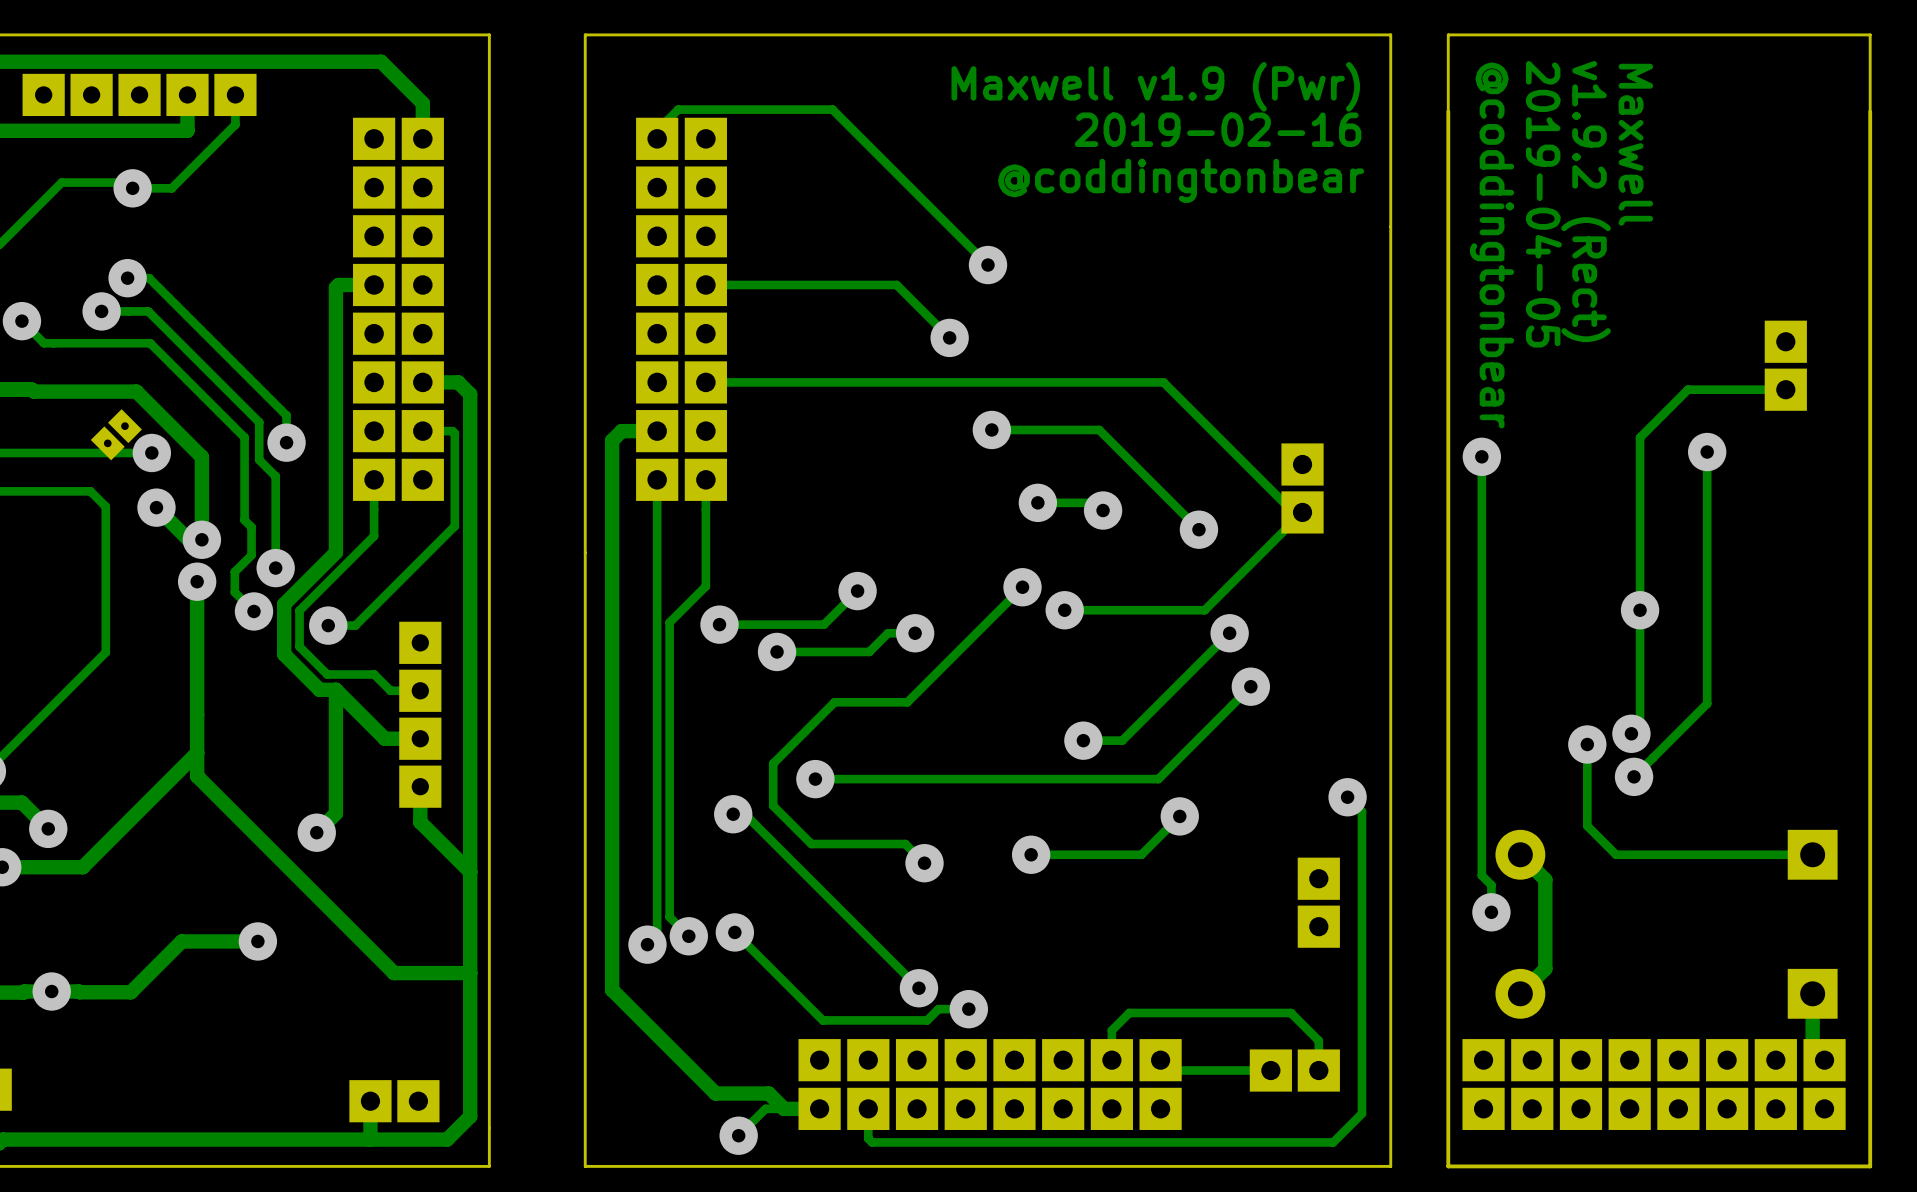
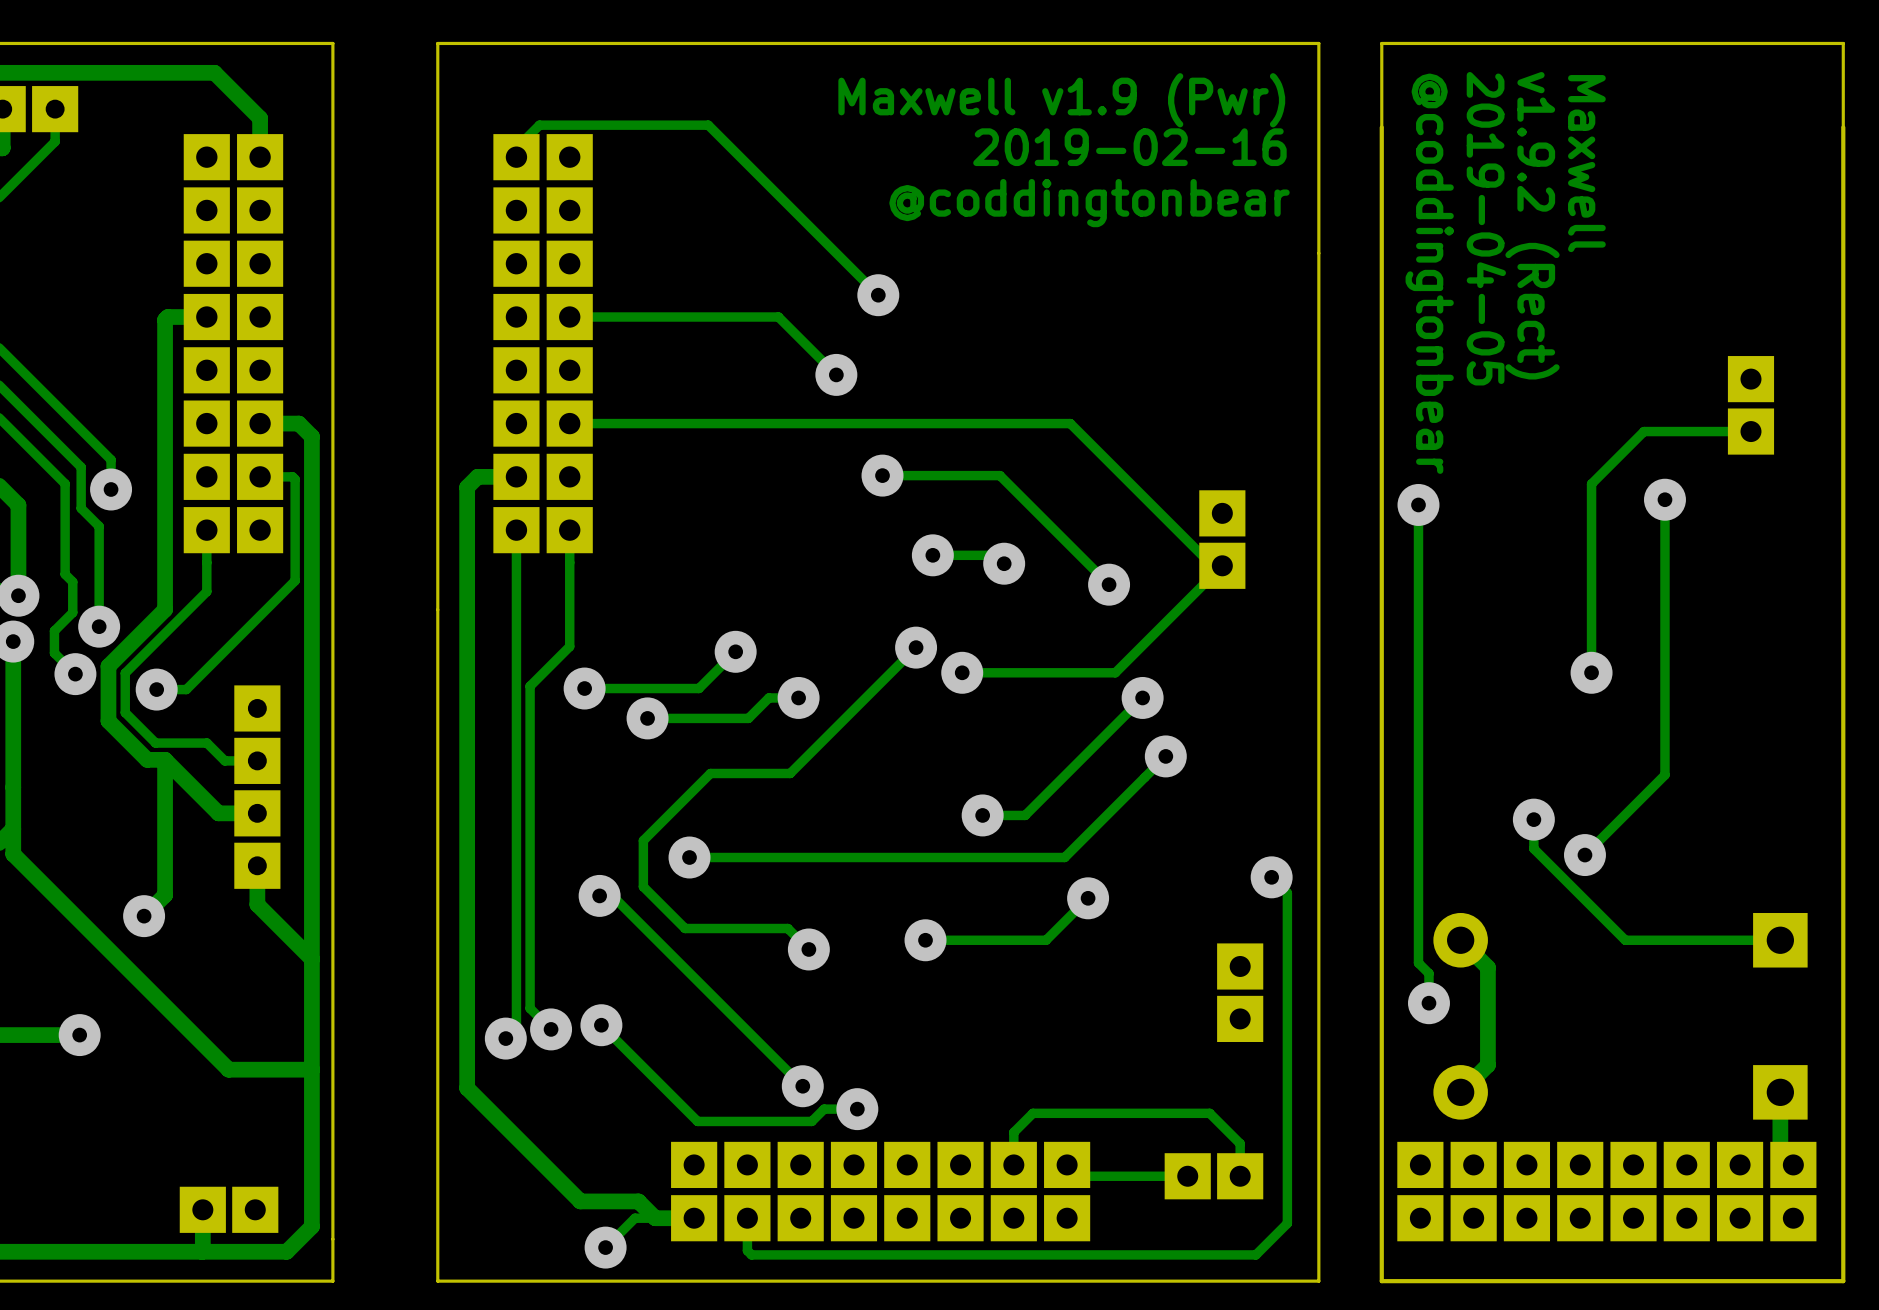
track: (1640, 610) (1640, 725) (1631, 733) -> none
via: (1631, 733) -> none
track: (1587, 771) (1587, 826) (1616, 854) (1670, 854) -> (1533, 848) (1625, 940)

